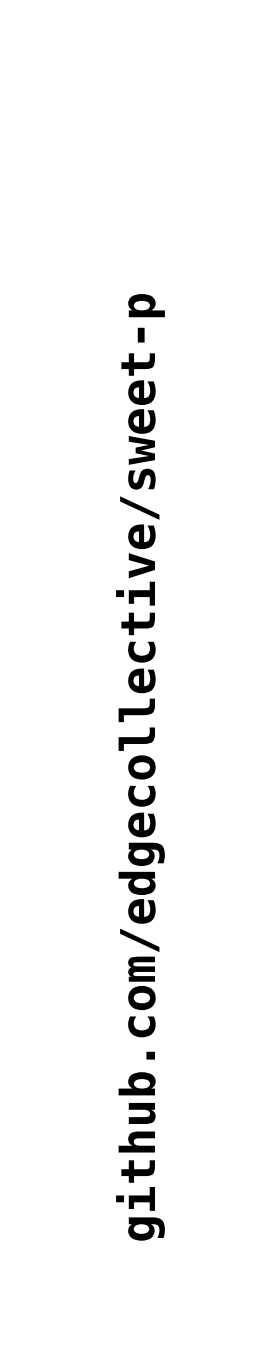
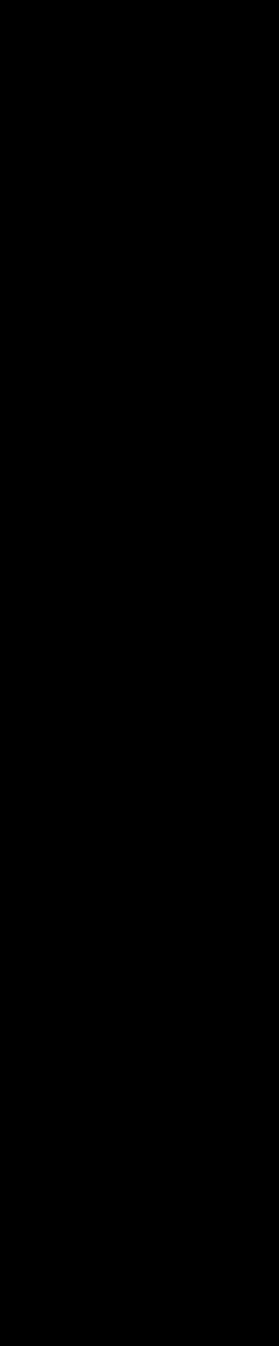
text: github.com/edgecollective/sweet-p (140, 767) -> none

